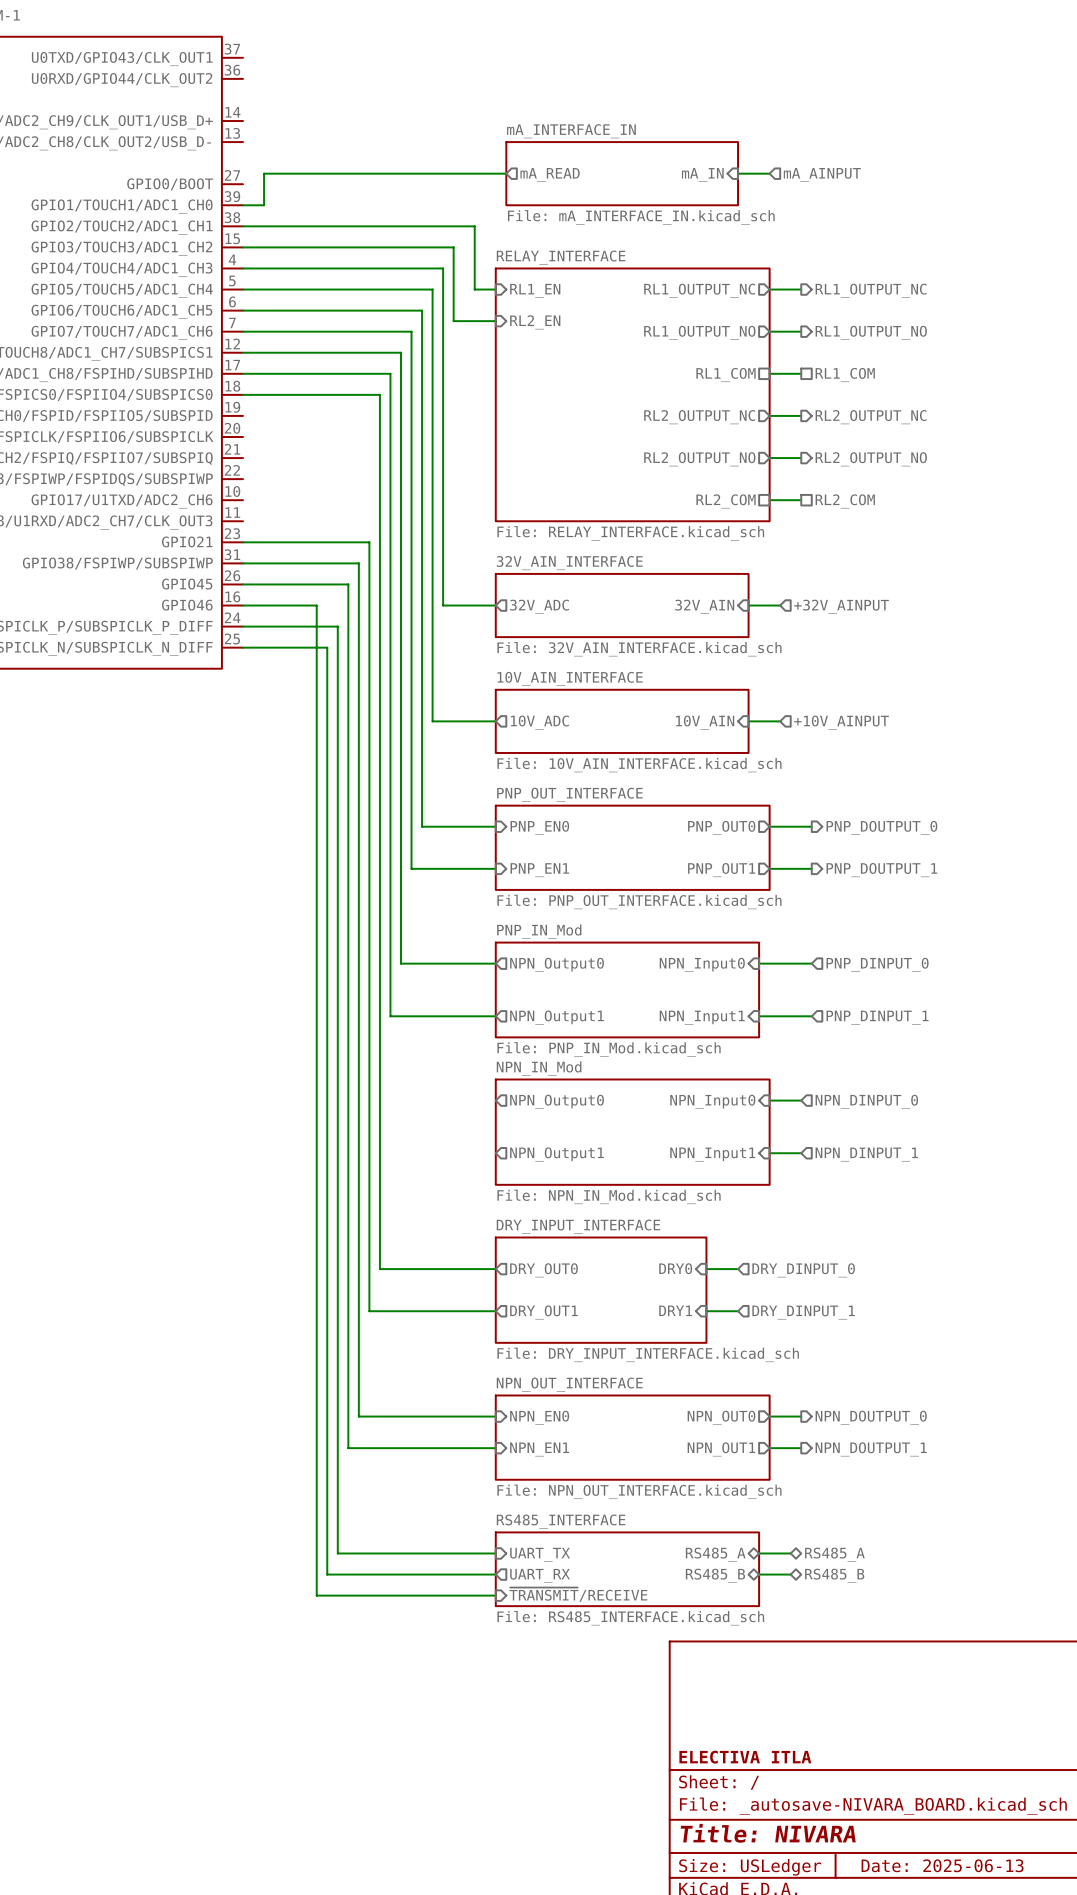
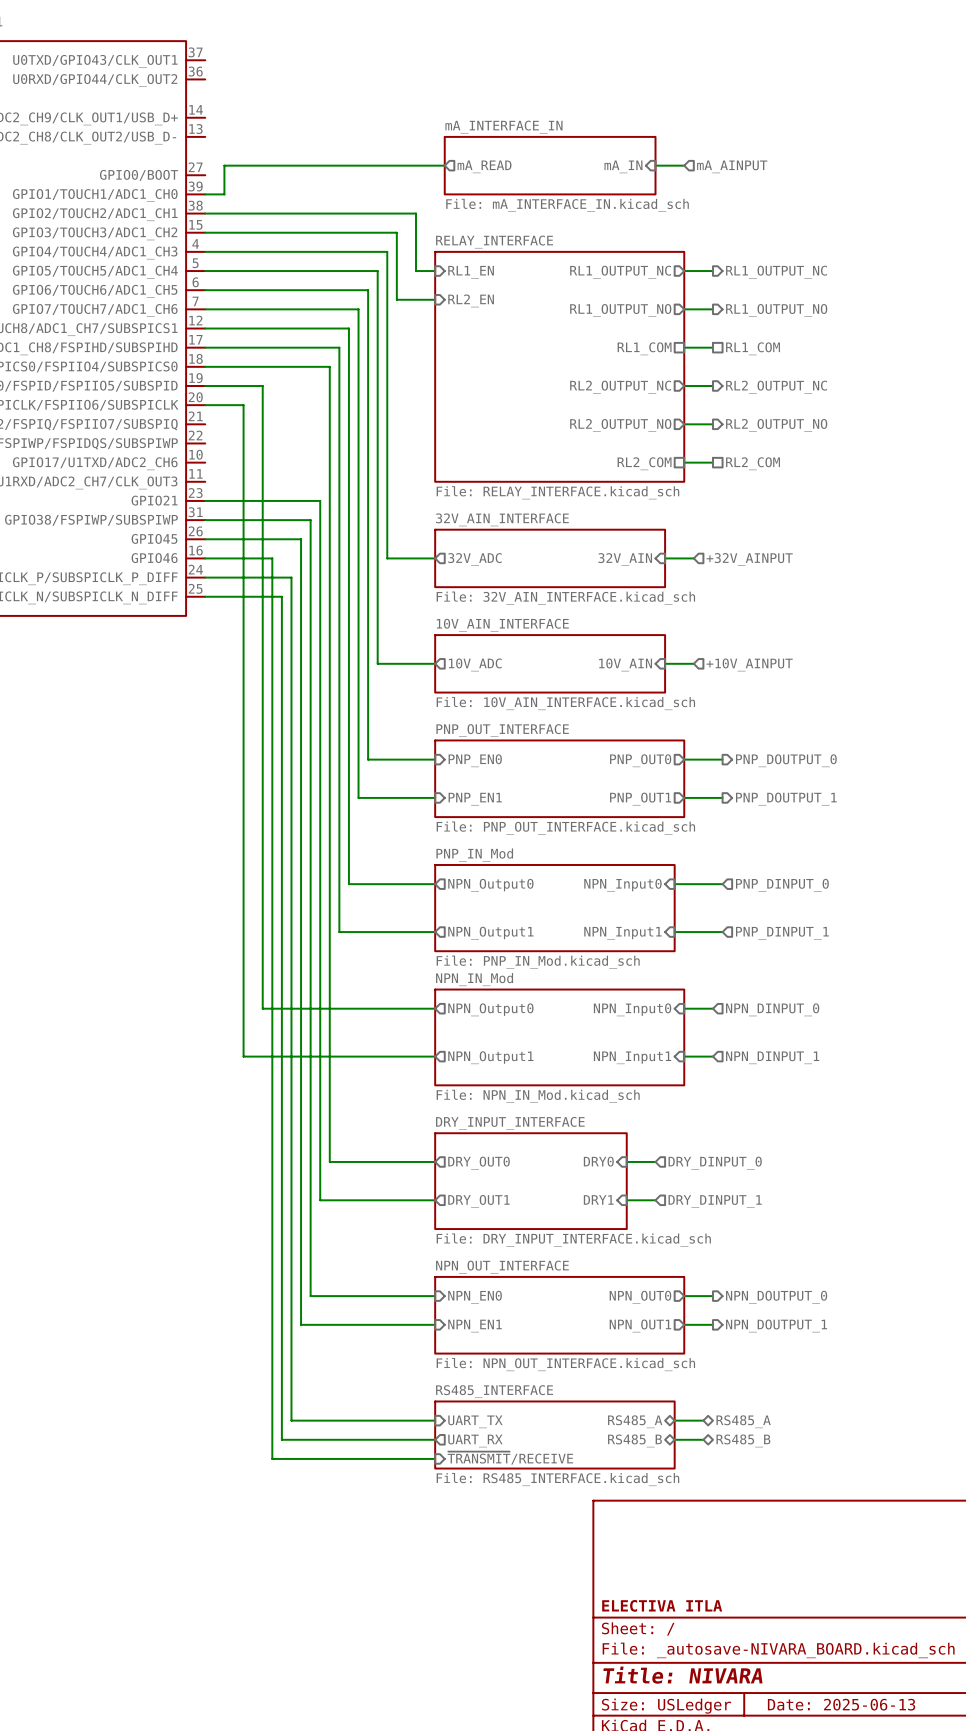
wire: none -> (205, 386) (262, 386) (262, 1008) (435, 1008)
wire: none -> (205, 405) (243, 405) (243, 1056) (435, 1056)

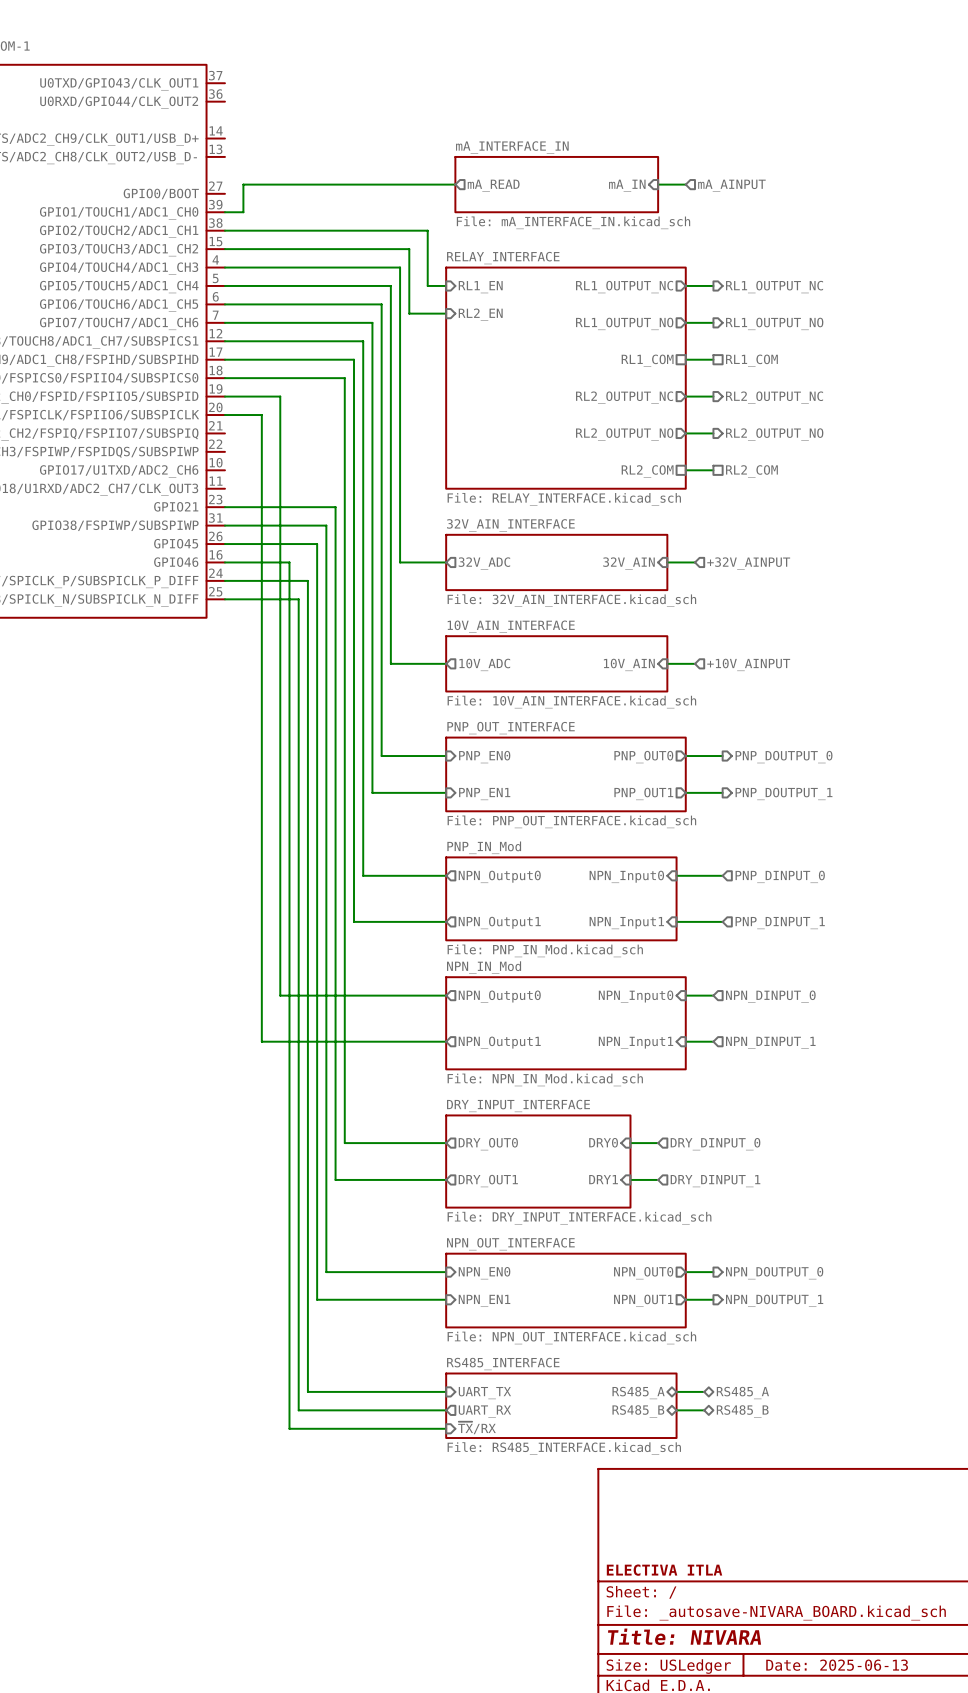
sheet pin: ~{TRANSMIT}/RECEIVE (510, 1458) -> ~{TX}/RX (476, 1427)

